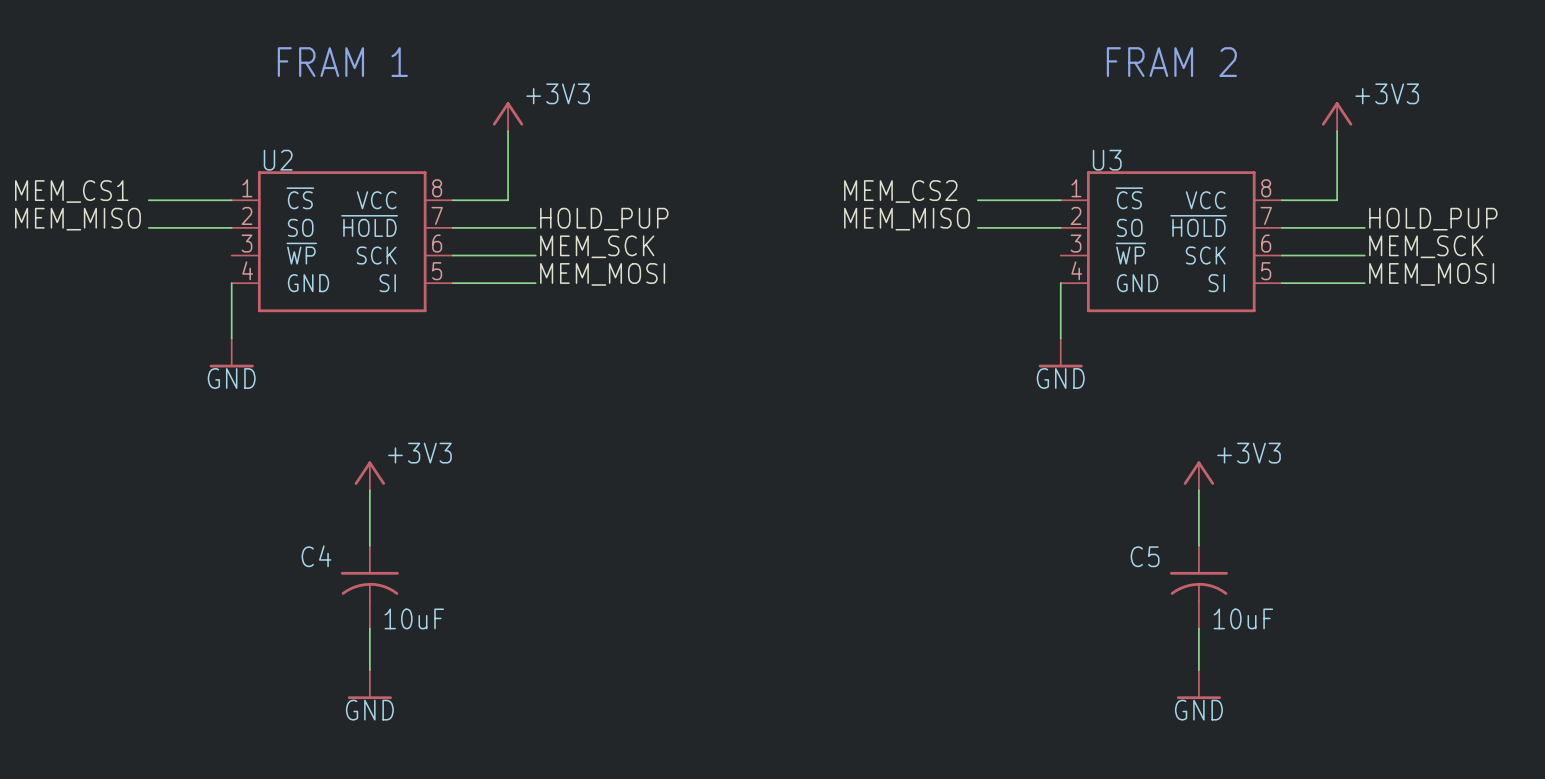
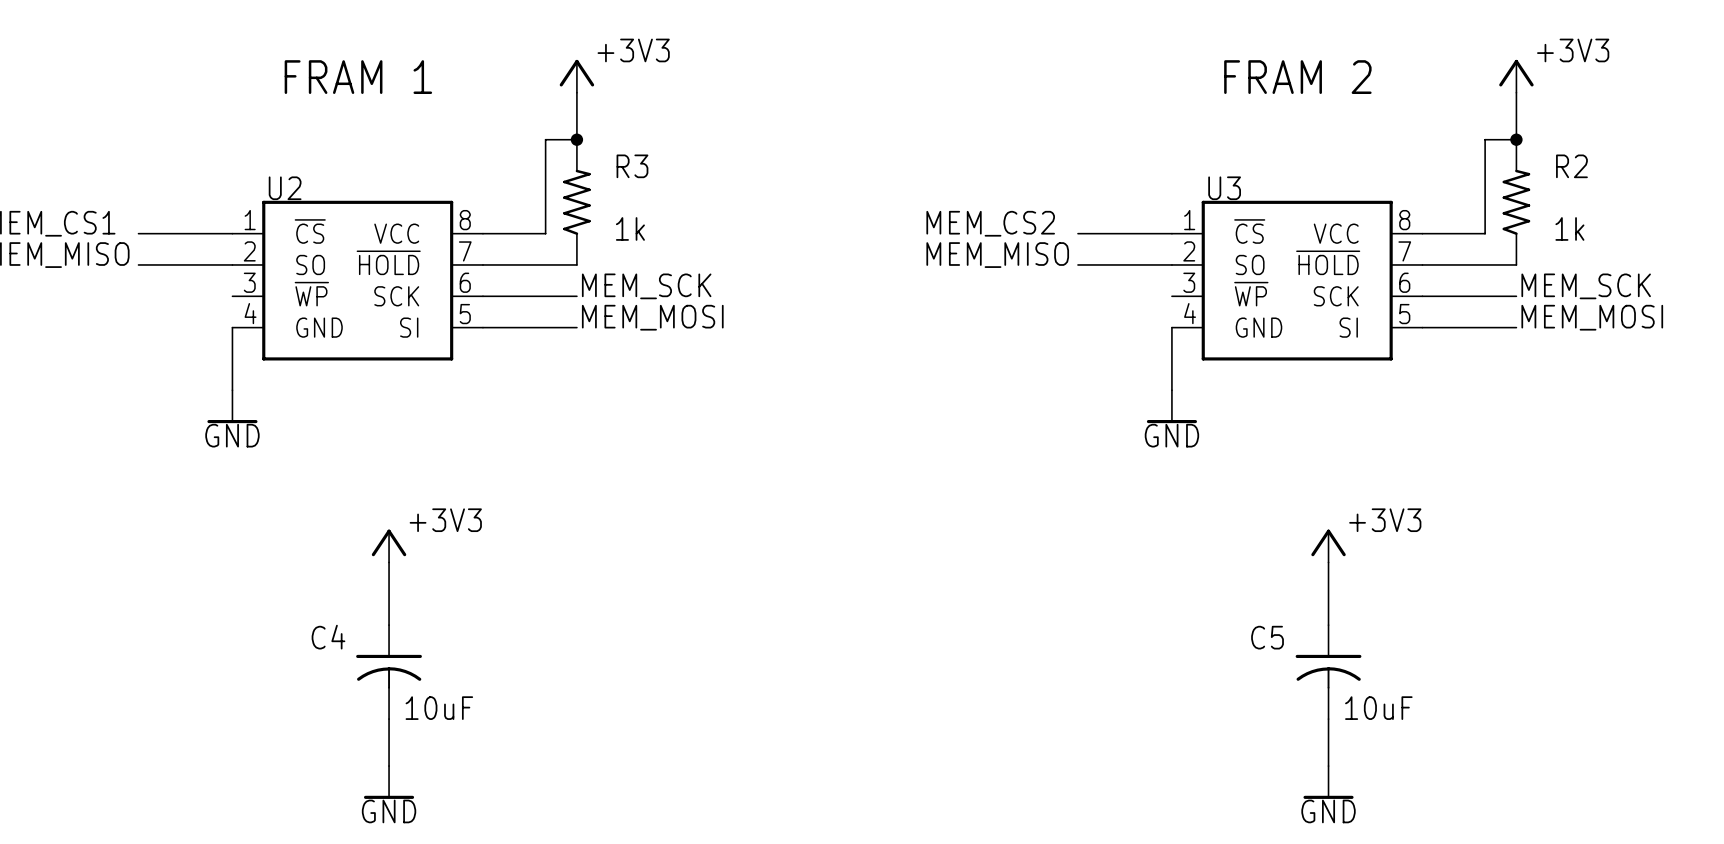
wire: none -> (576, 92) (576, 139) (545, 139) (545, 155)
wire: none -> (1516, 92) (1516, 139) (1485, 139) (1485, 155)
power symbol position: +3V3 (508, 116) -> +3V3 (576, 76)
power symbol position: +3V3 (1337, 116) -> +3V3 (1516, 76)
junction: none -> (576, 139)
junction: none -> (1516, 139)
R3: none -> 1k (576, 202)
R2: none -> 1k (1516, 202)
label: HOLD_PUP (604, 219) -> none
label: HOLD_PUP (1433, 219) -> none

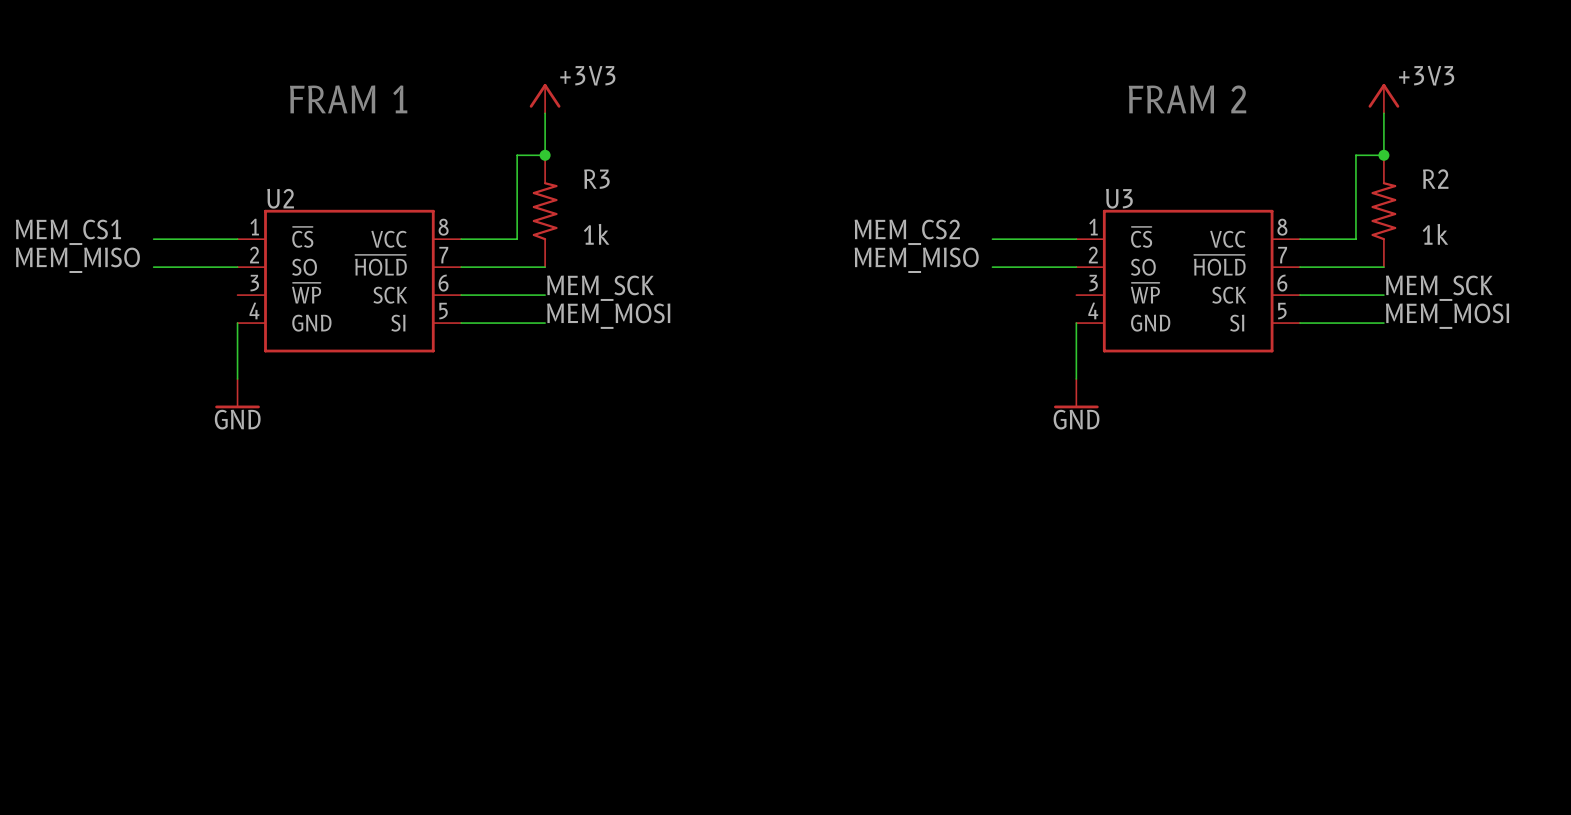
power symbol: +3V3 (389, 546) -> none
power symbol: +3V3 (1328, 546) -> none
wire: (389, 562) (389, 625) -> none
wire: (1328, 562) (1328, 625) -> none
C4: 10uF (389, 672) -> none
C5: 10uF (1328, 672) -> none
wire: (389, 719) (389, 766) -> none
wire: (1328, 719) (1328, 766) -> none
power symbol: GND (389, 782) -> none
power symbol: GND (1328, 782) -> none

